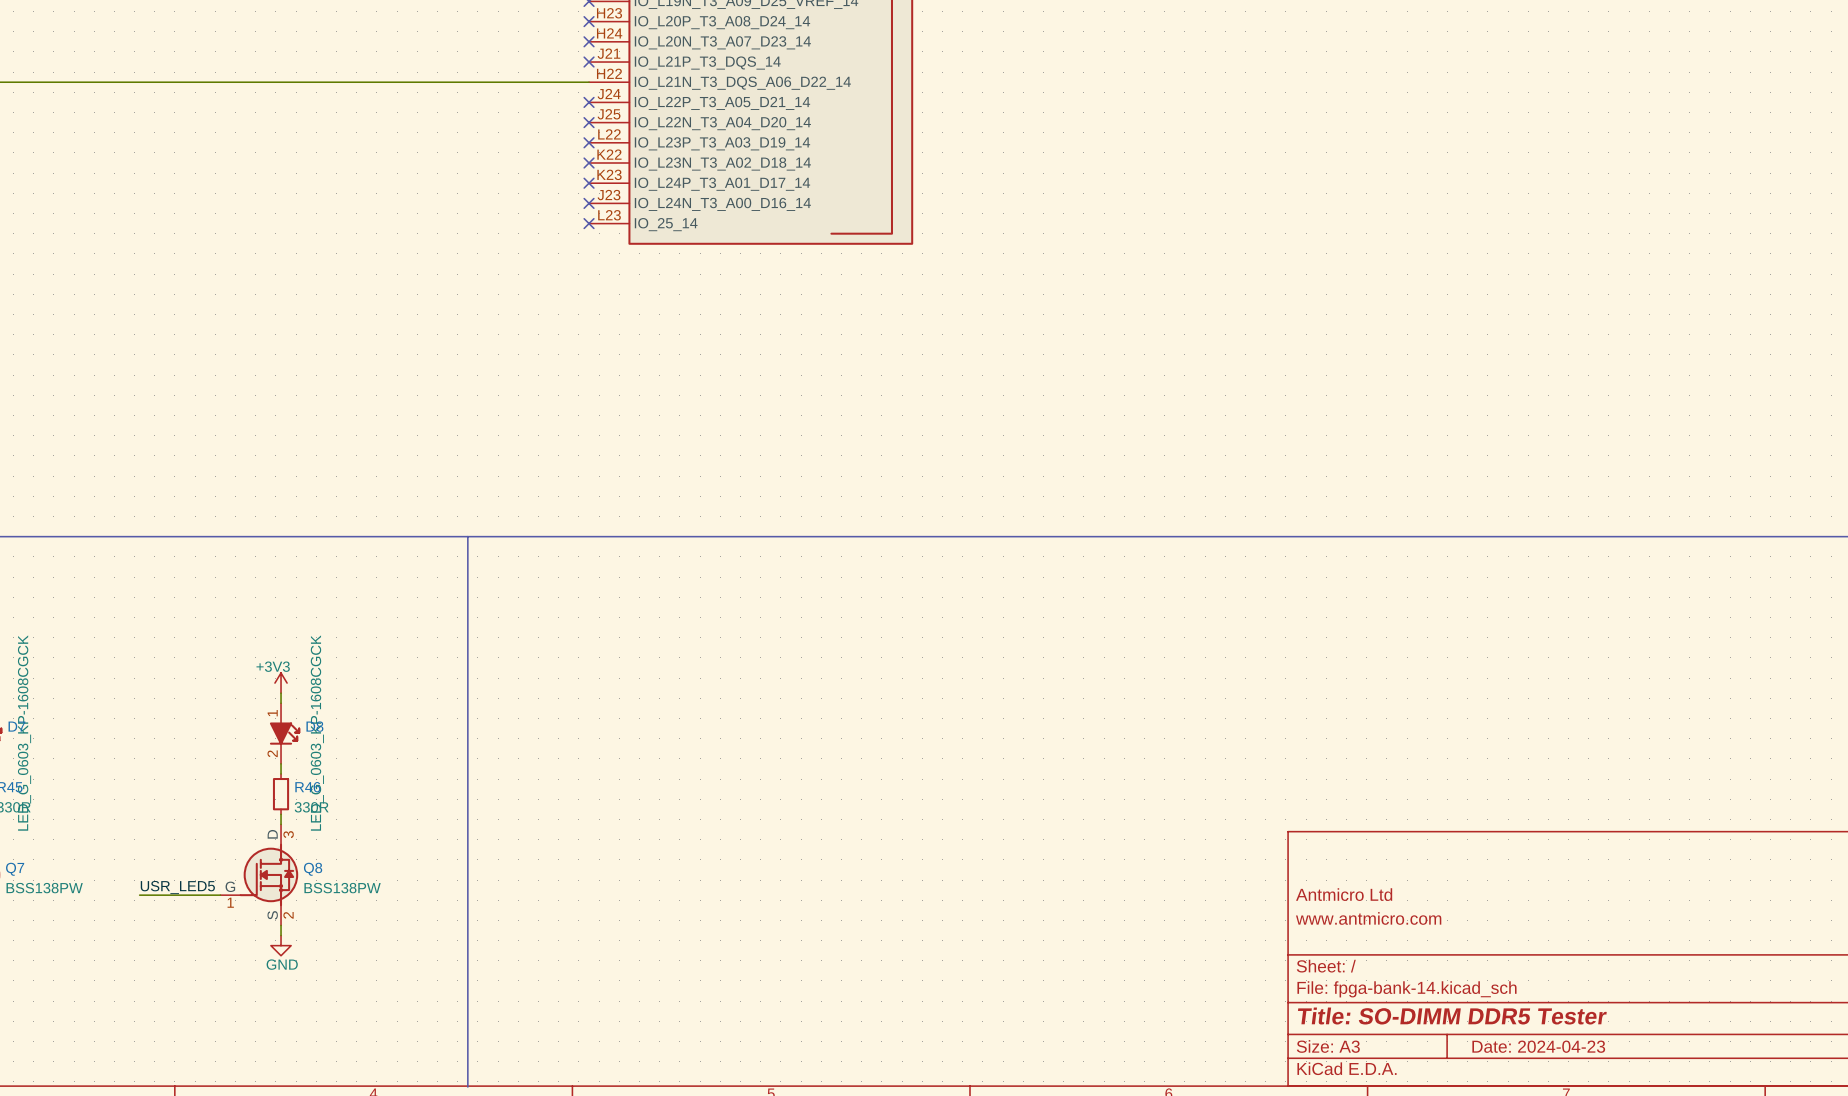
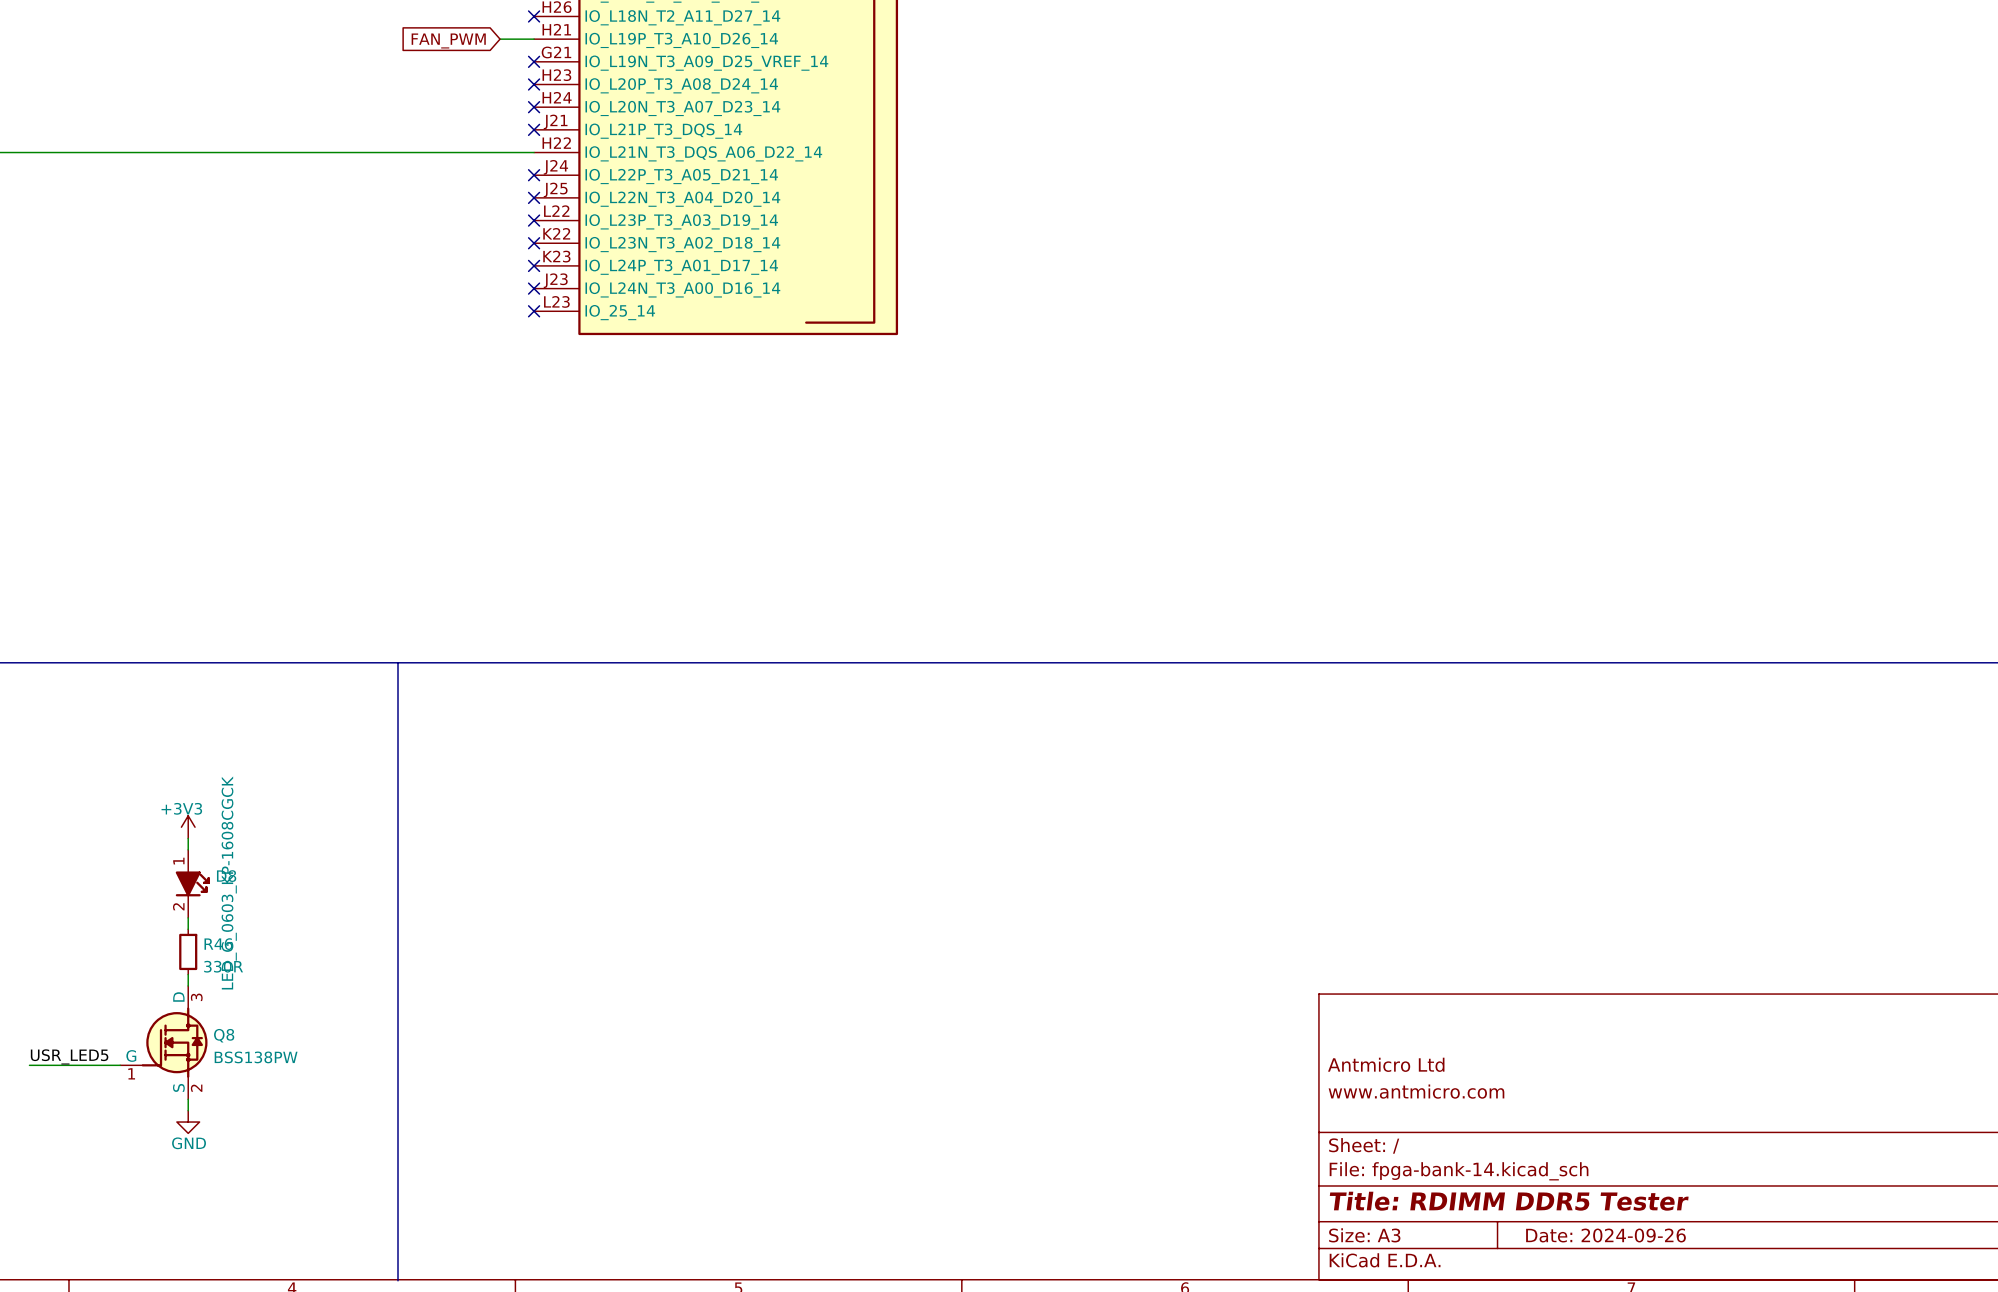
title block: Title: SO-DIMM DDR5 Tester (1452, 1016) -> Title: RDIMM DDR5 Tester (1509, 1201)
title block: Date: 2024-04-23 (1538, 1046) -> Date: 2024-09-26 (1605, 1235)

